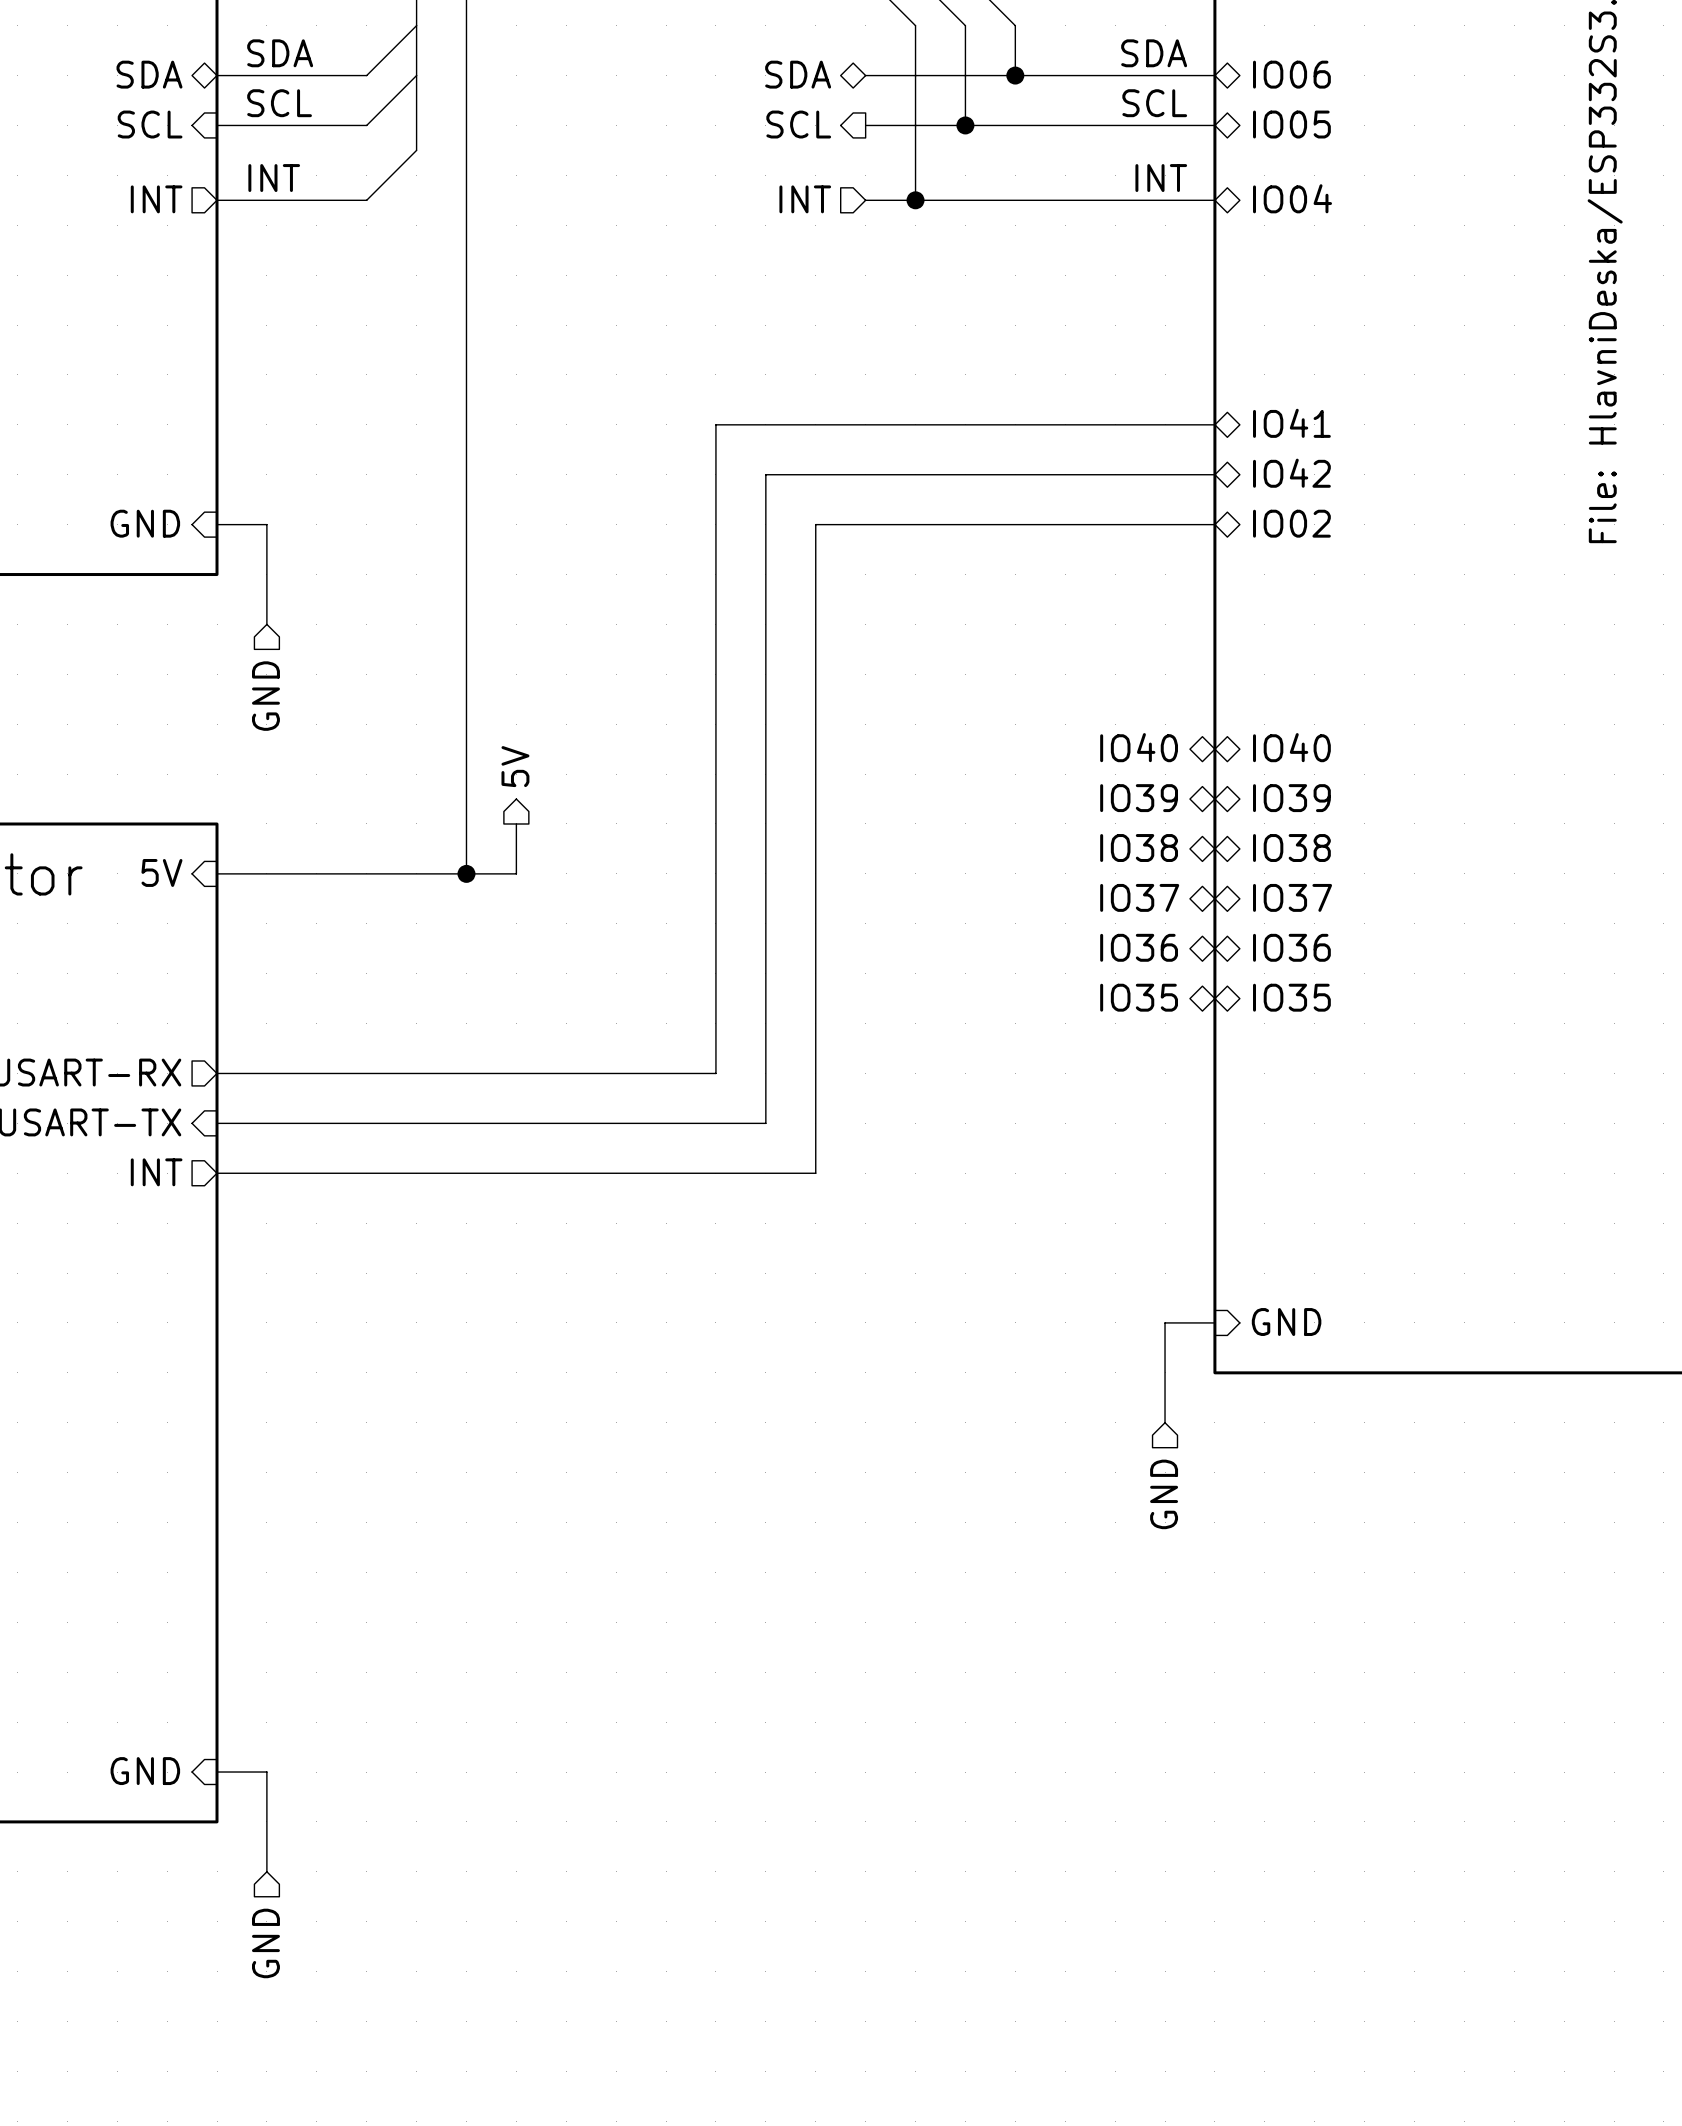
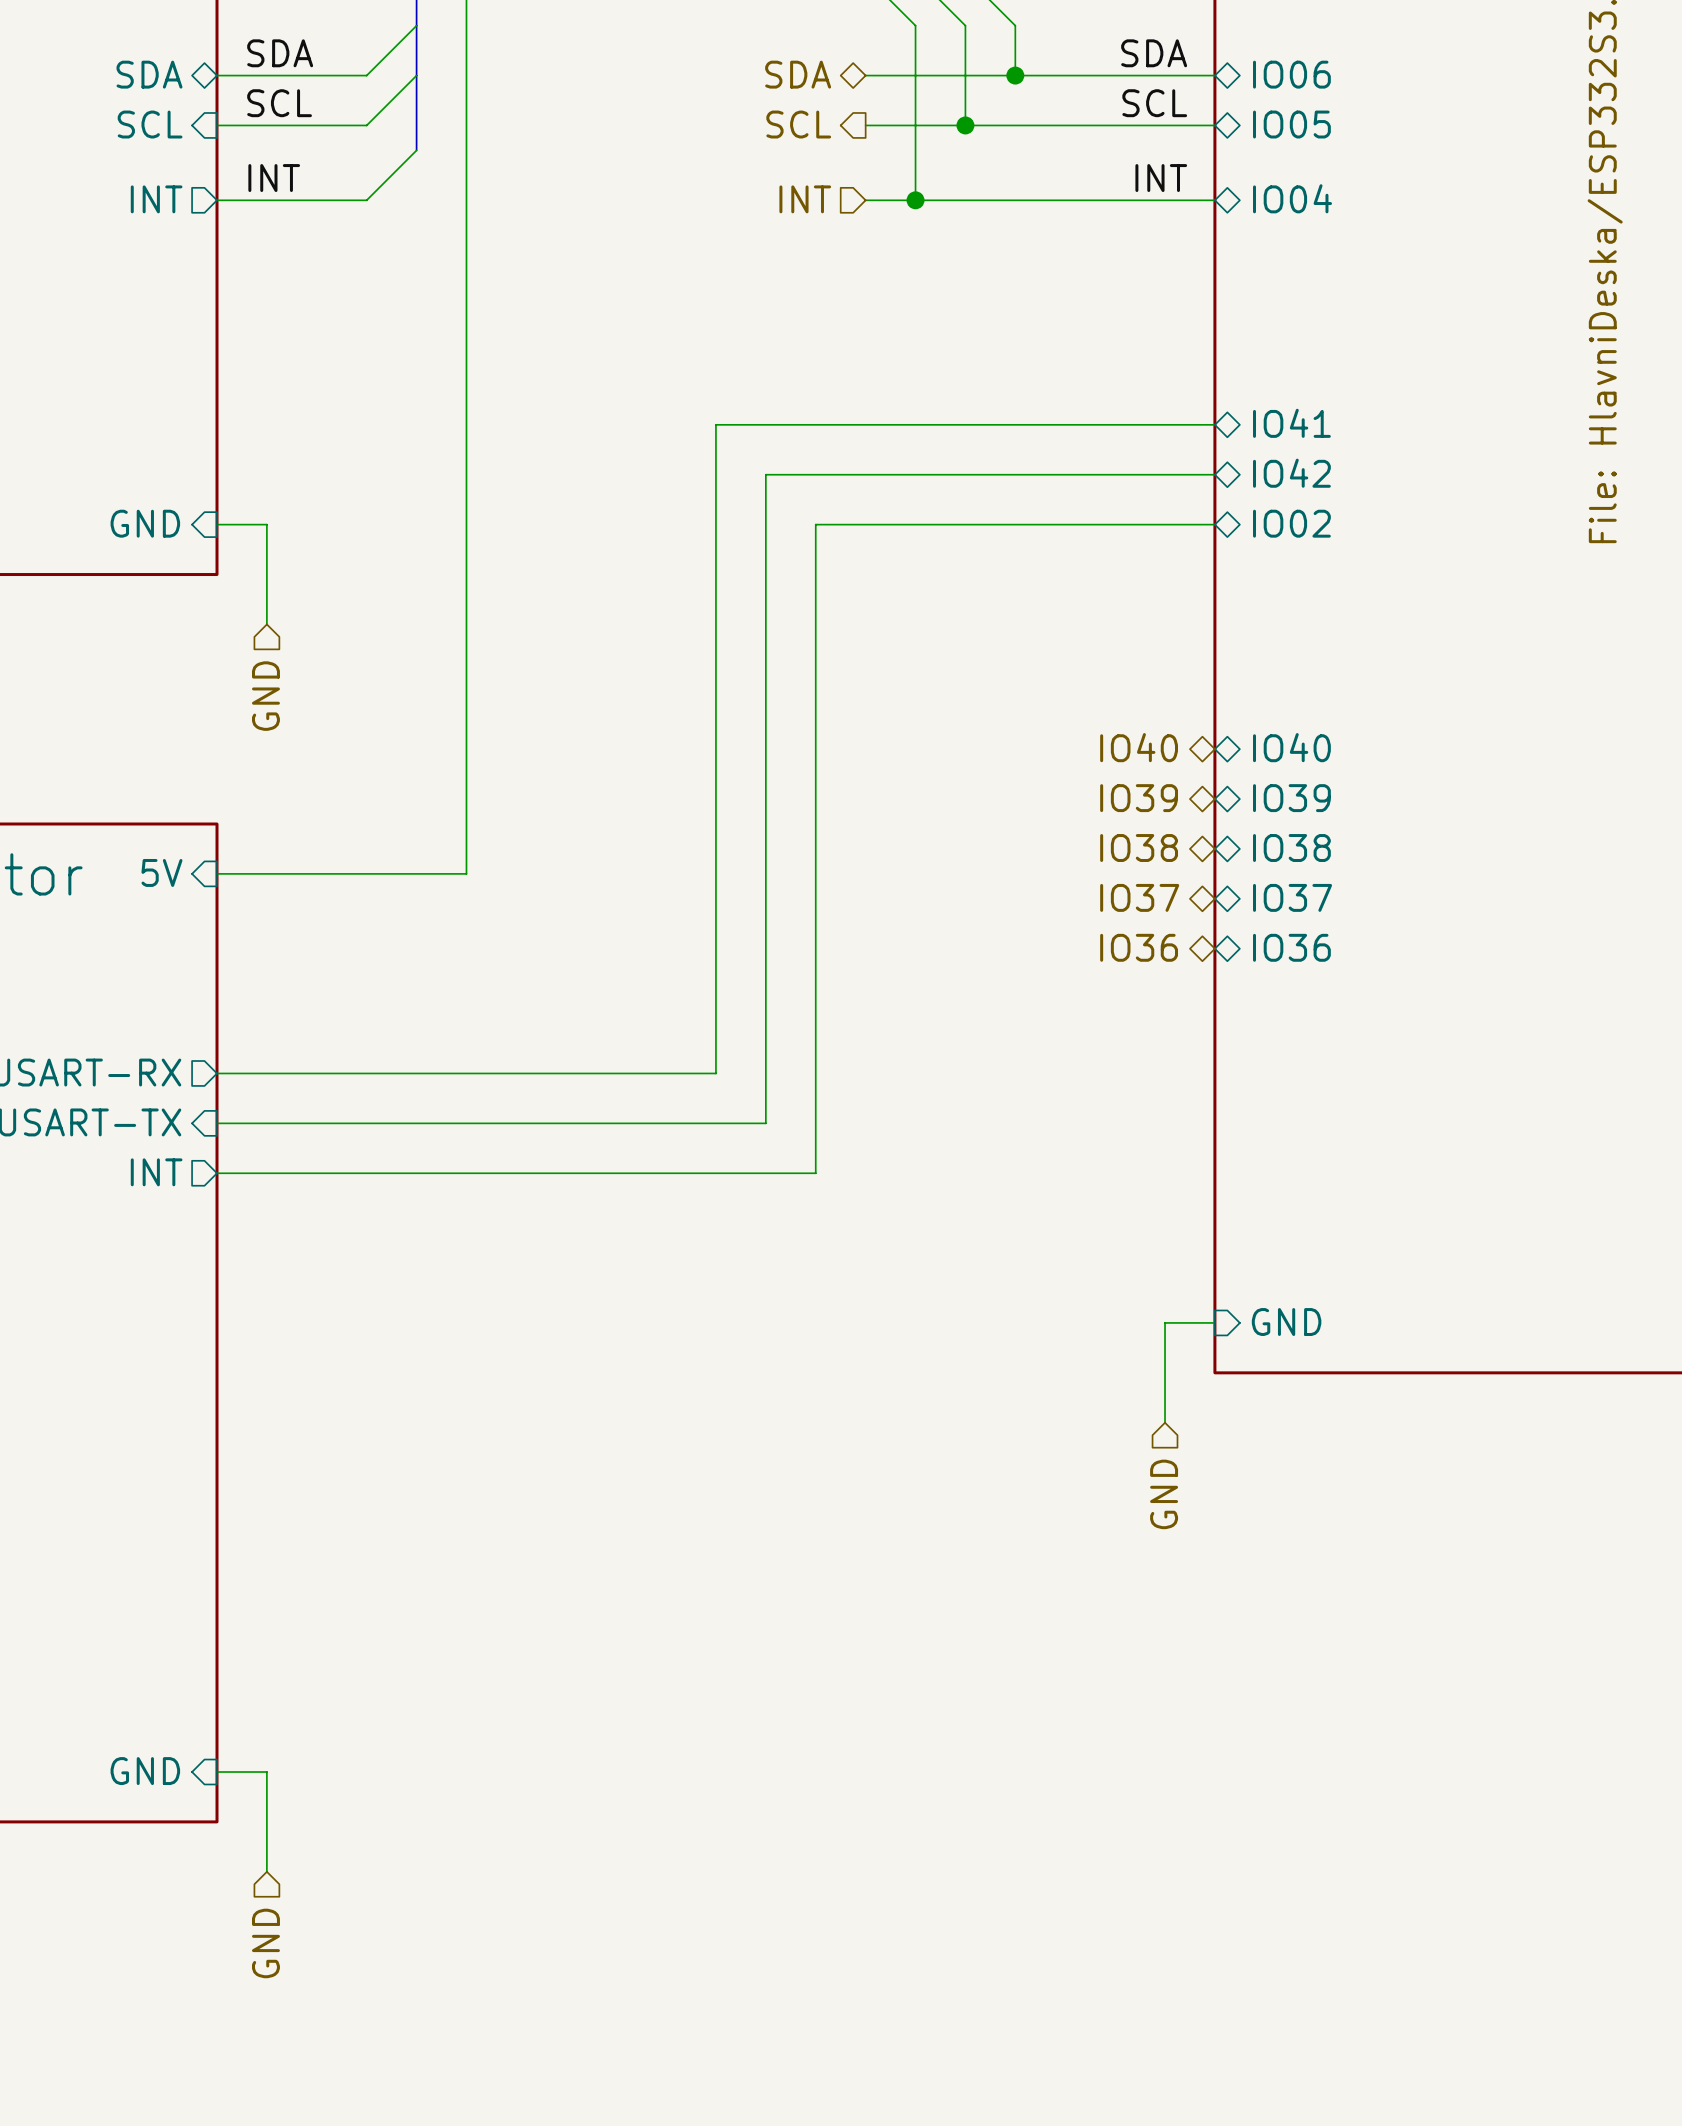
hierarchical label: 5V (515, 766) -> none
wire: (516, 823) (516, 873) (466, 873) -> none
junction: (466, 873) -> none
hierarchical label: IO35 (1139, 997) -> none
sheet pin: IO35 (1291, 997) -> none

